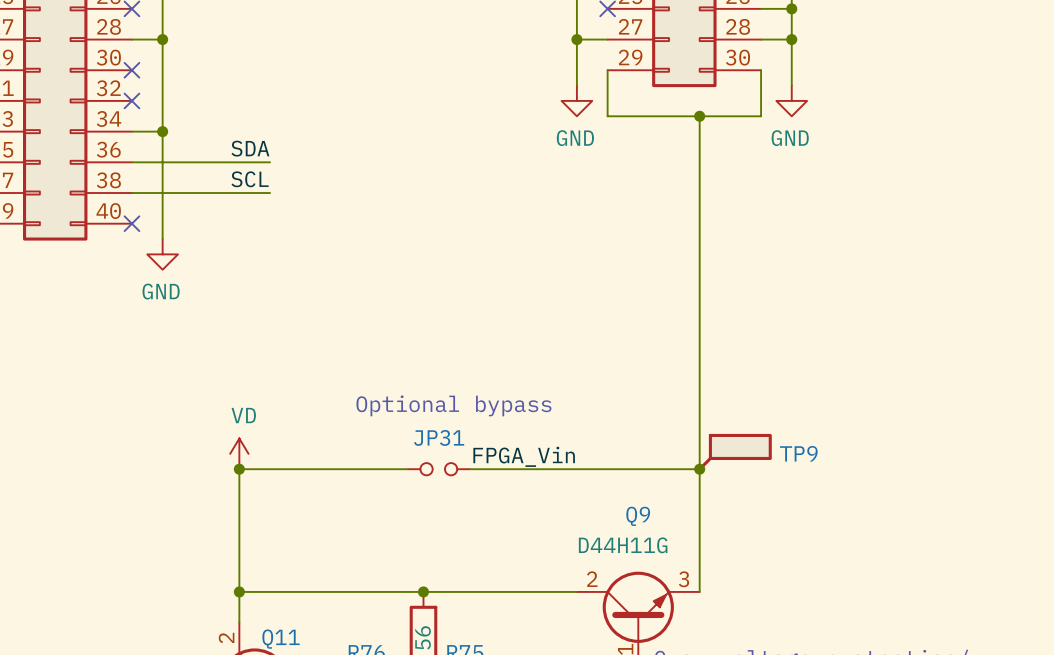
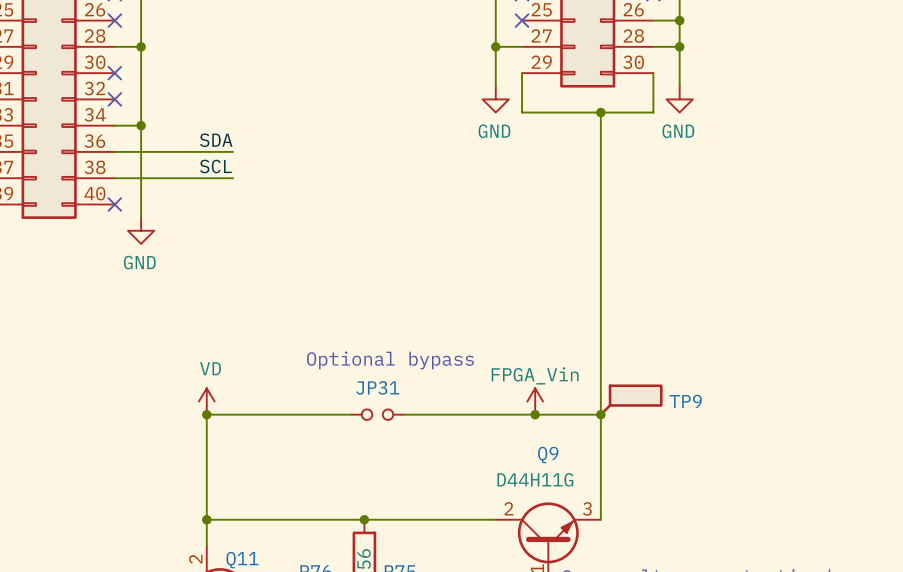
power symbol: none -> FPGA_Vin (535, 401)
label: FPGA_Vin (524, 456) -> none
junction: none -> (535, 414)

